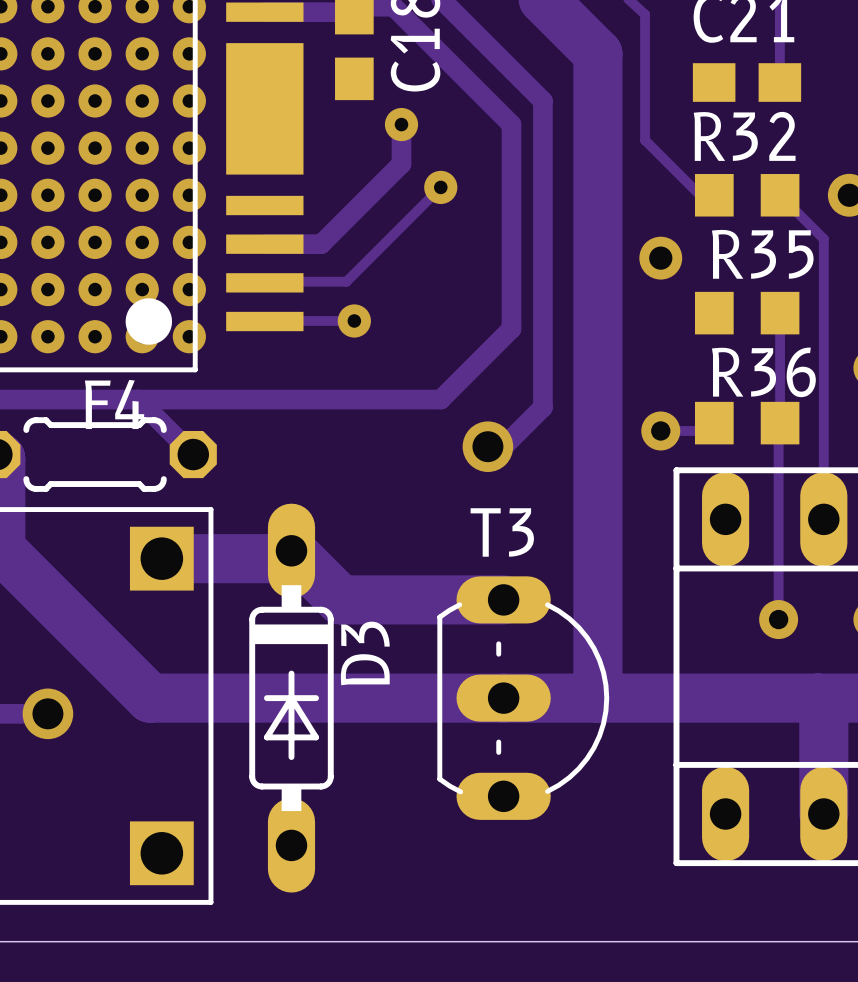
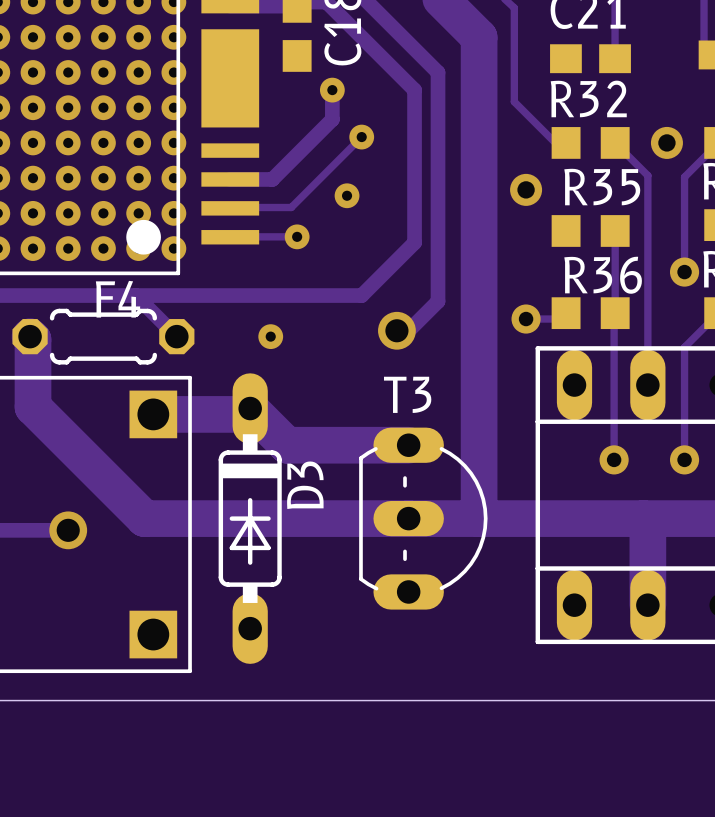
via: none -> (347, 195)
via: none -> (270, 336)

